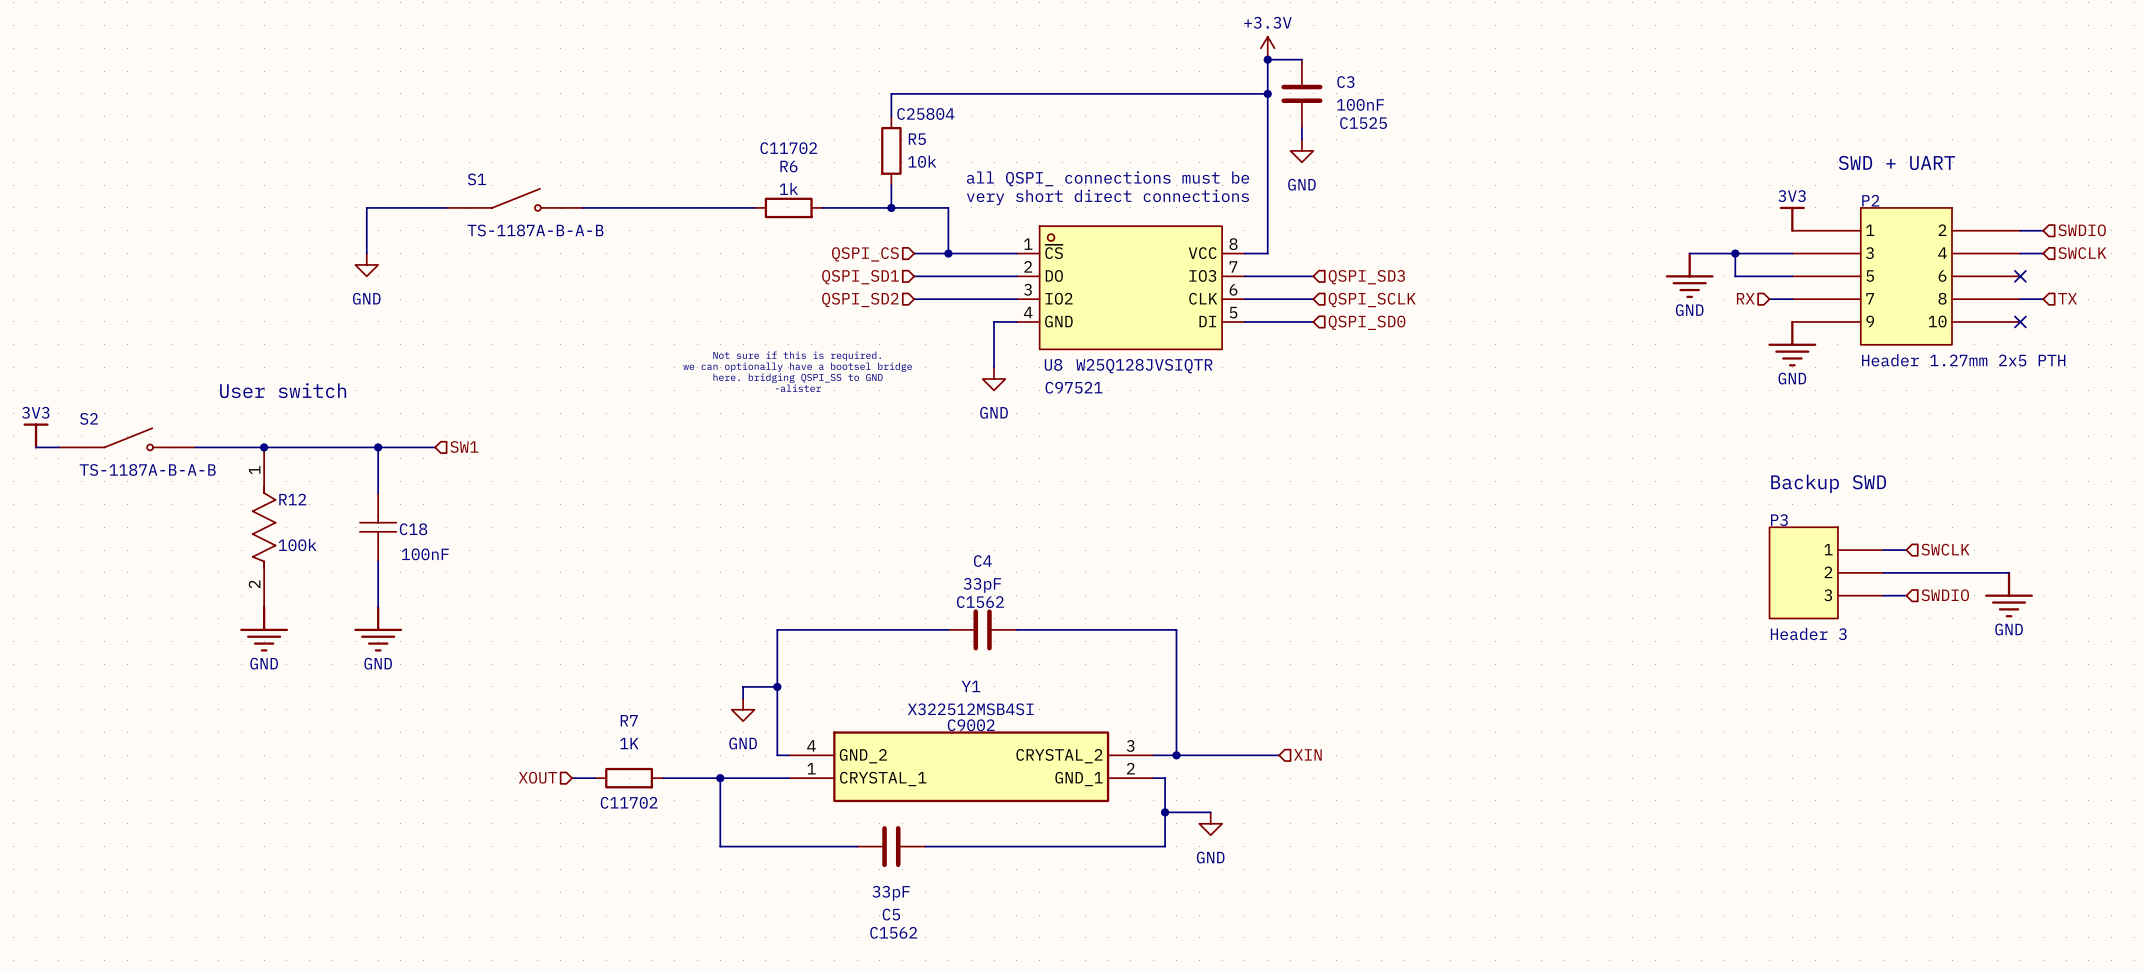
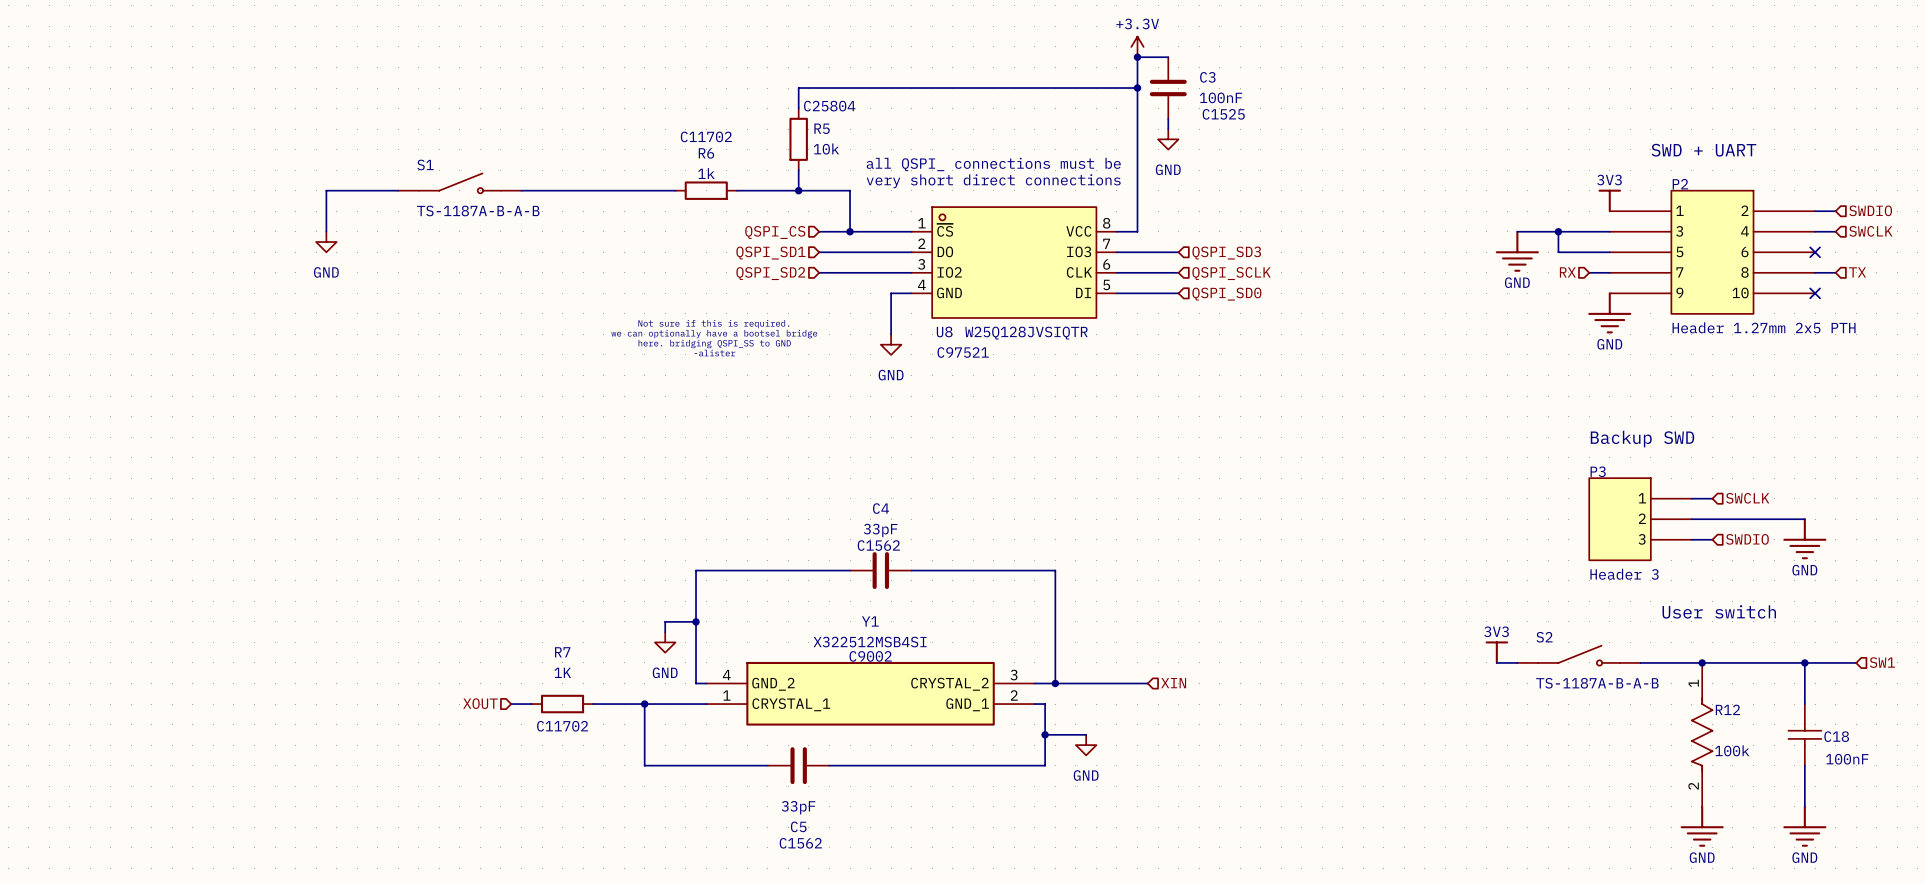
text: User switch (283, 390) -> none
power symbol: 3V3 (36, 436) -> none
S2 position: (127, 439) -> (1578, 655)
wire: (36, 447) (58, 447) -> none
wire: (195, 447) (435, 447) -> none
junction: (264, 447) -> none
wire: (378, 447) (378, 493) -> none
junction: (378, 447) -> none
hierarchical label: SW1 (464, 447) -> none
R12 position: (264, 527) -> (1702, 734)
C18 position: (378, 527) -> (1804, 734)
wire: (378, 561) (378, 607) -> none
power symbol: GND (264, 628) -> none
power symbol: GND (378, 628) -> none
text: none -> User switch (1719, 611)
power symbol: none -> 3V3 (1496, 652)
wire: none -> (1496, 662) (1517, 662)
wire: none -> (1640, 662) (1856, 662)
junction: none -> (1702, 662)
wire: none -> (1804, 662) (1804, 704)
junction: none -> (1804, 662)
hierarchical label: none -> SW1 (1882, 662)
wire: none -> (1804, 765) (1804, 806)
power symbol: none -> GND (1702, 826)
power symbol: none -> GND (1804, 826)

